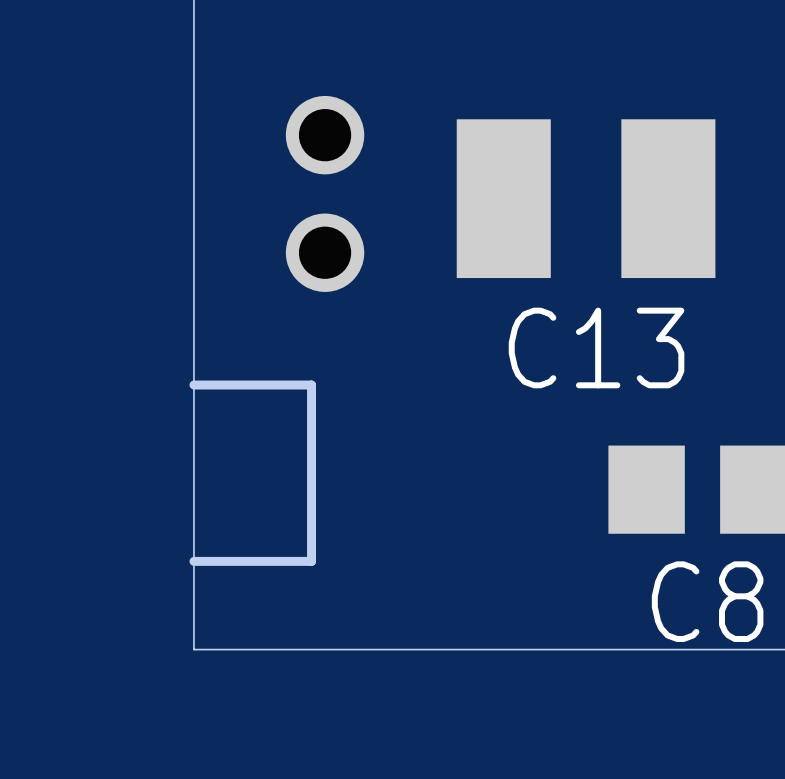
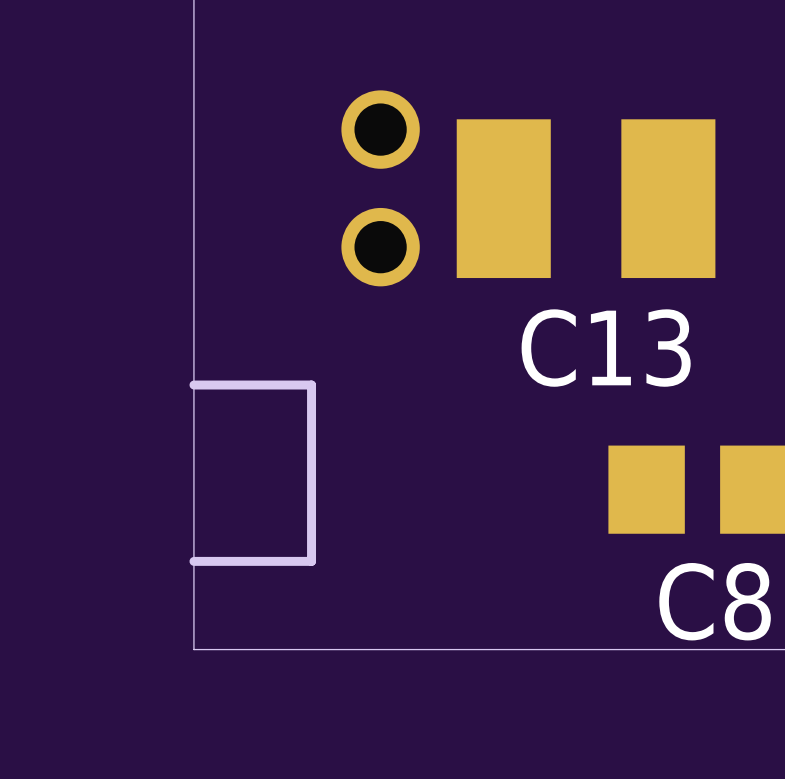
part position: (325, 193) -> (380, 188)

